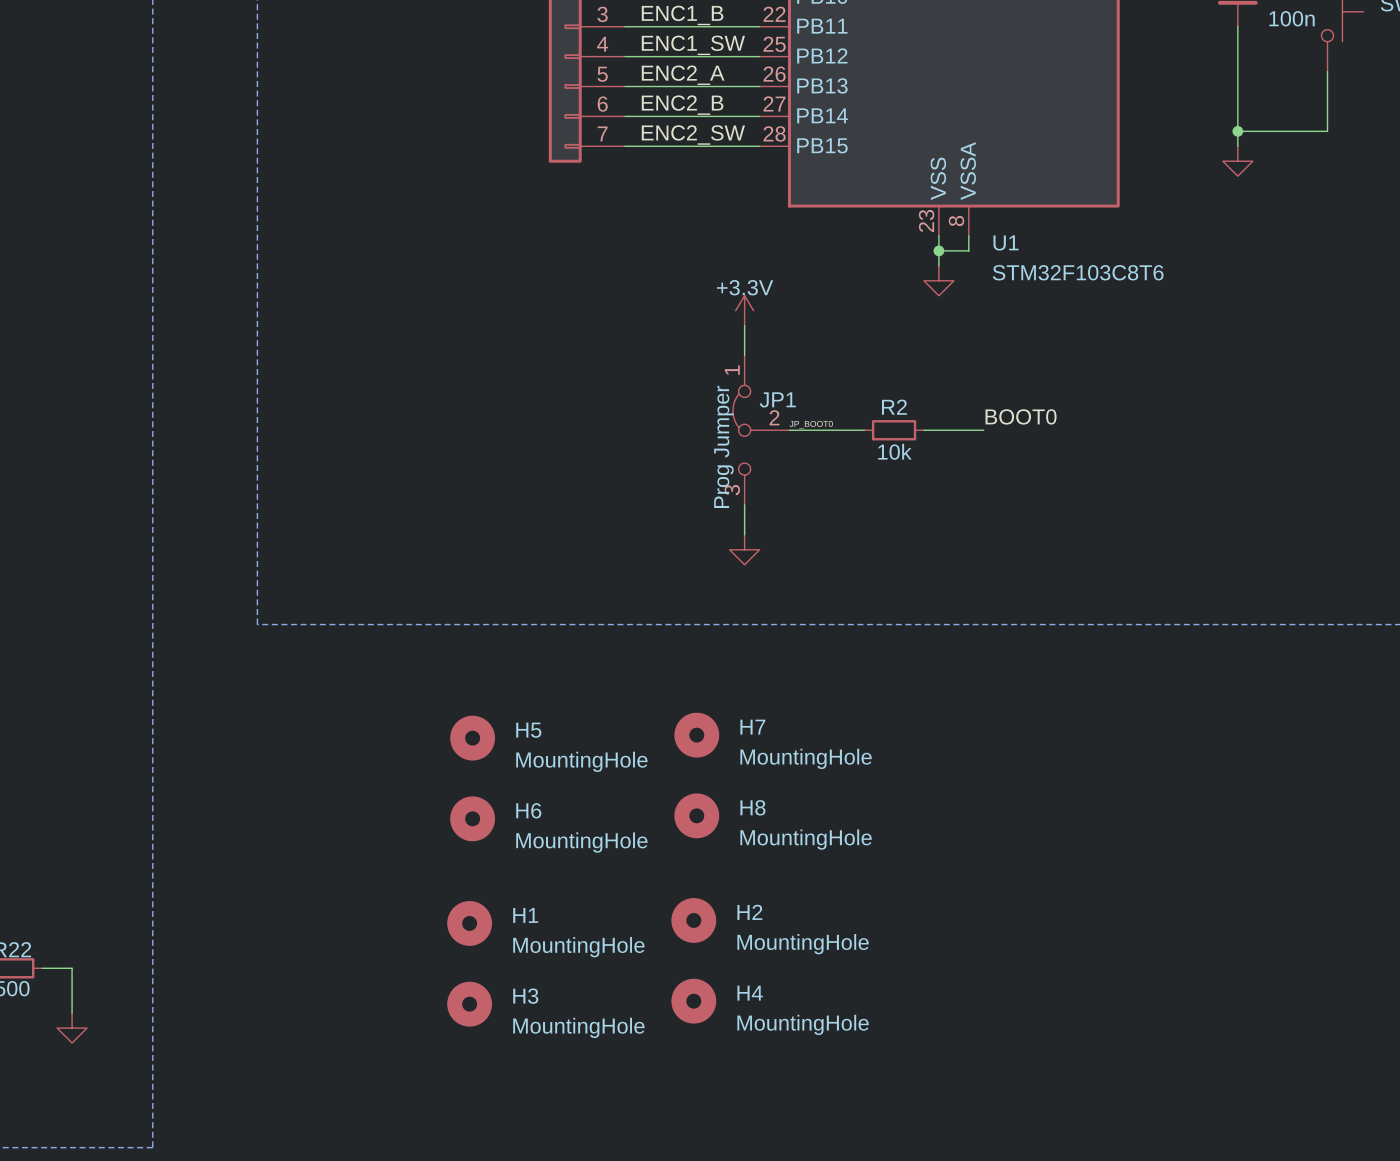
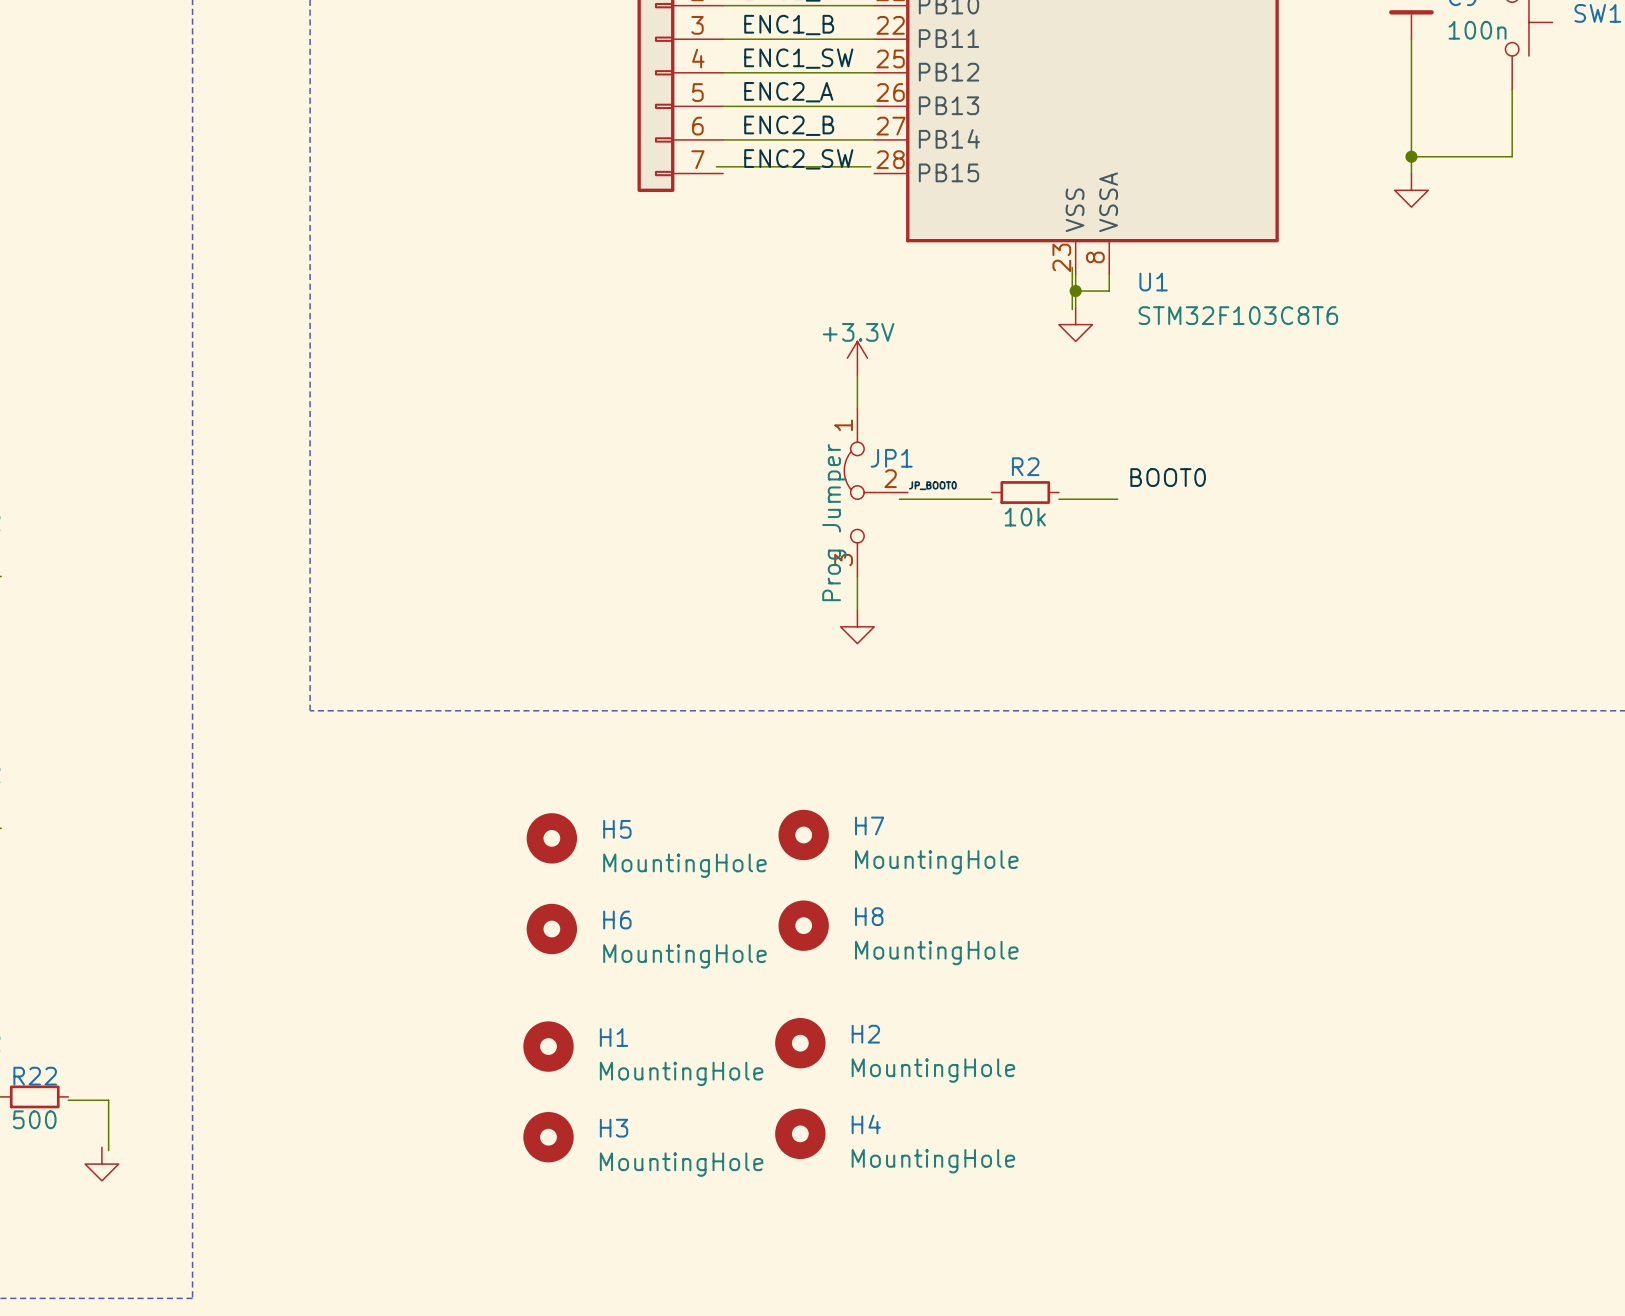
wire: none -> (716, 166) (870, 166)
wire: (625, 146) (759, 146) -> none
wire: none -> (1072, 267) (1072, 309)
wire: (789, 430) (864, 430) -> none
wire: (923, 430) (983, 430) -> none
wire: none -> (899, 499) (991, 499)
wire: none -> (1058, 499) (1117, 499)
wire: (42, 968) (72, 968) (72, 1013) -> none
wire: none -> (68, 1100) (108, 1100) (108, 1150)

